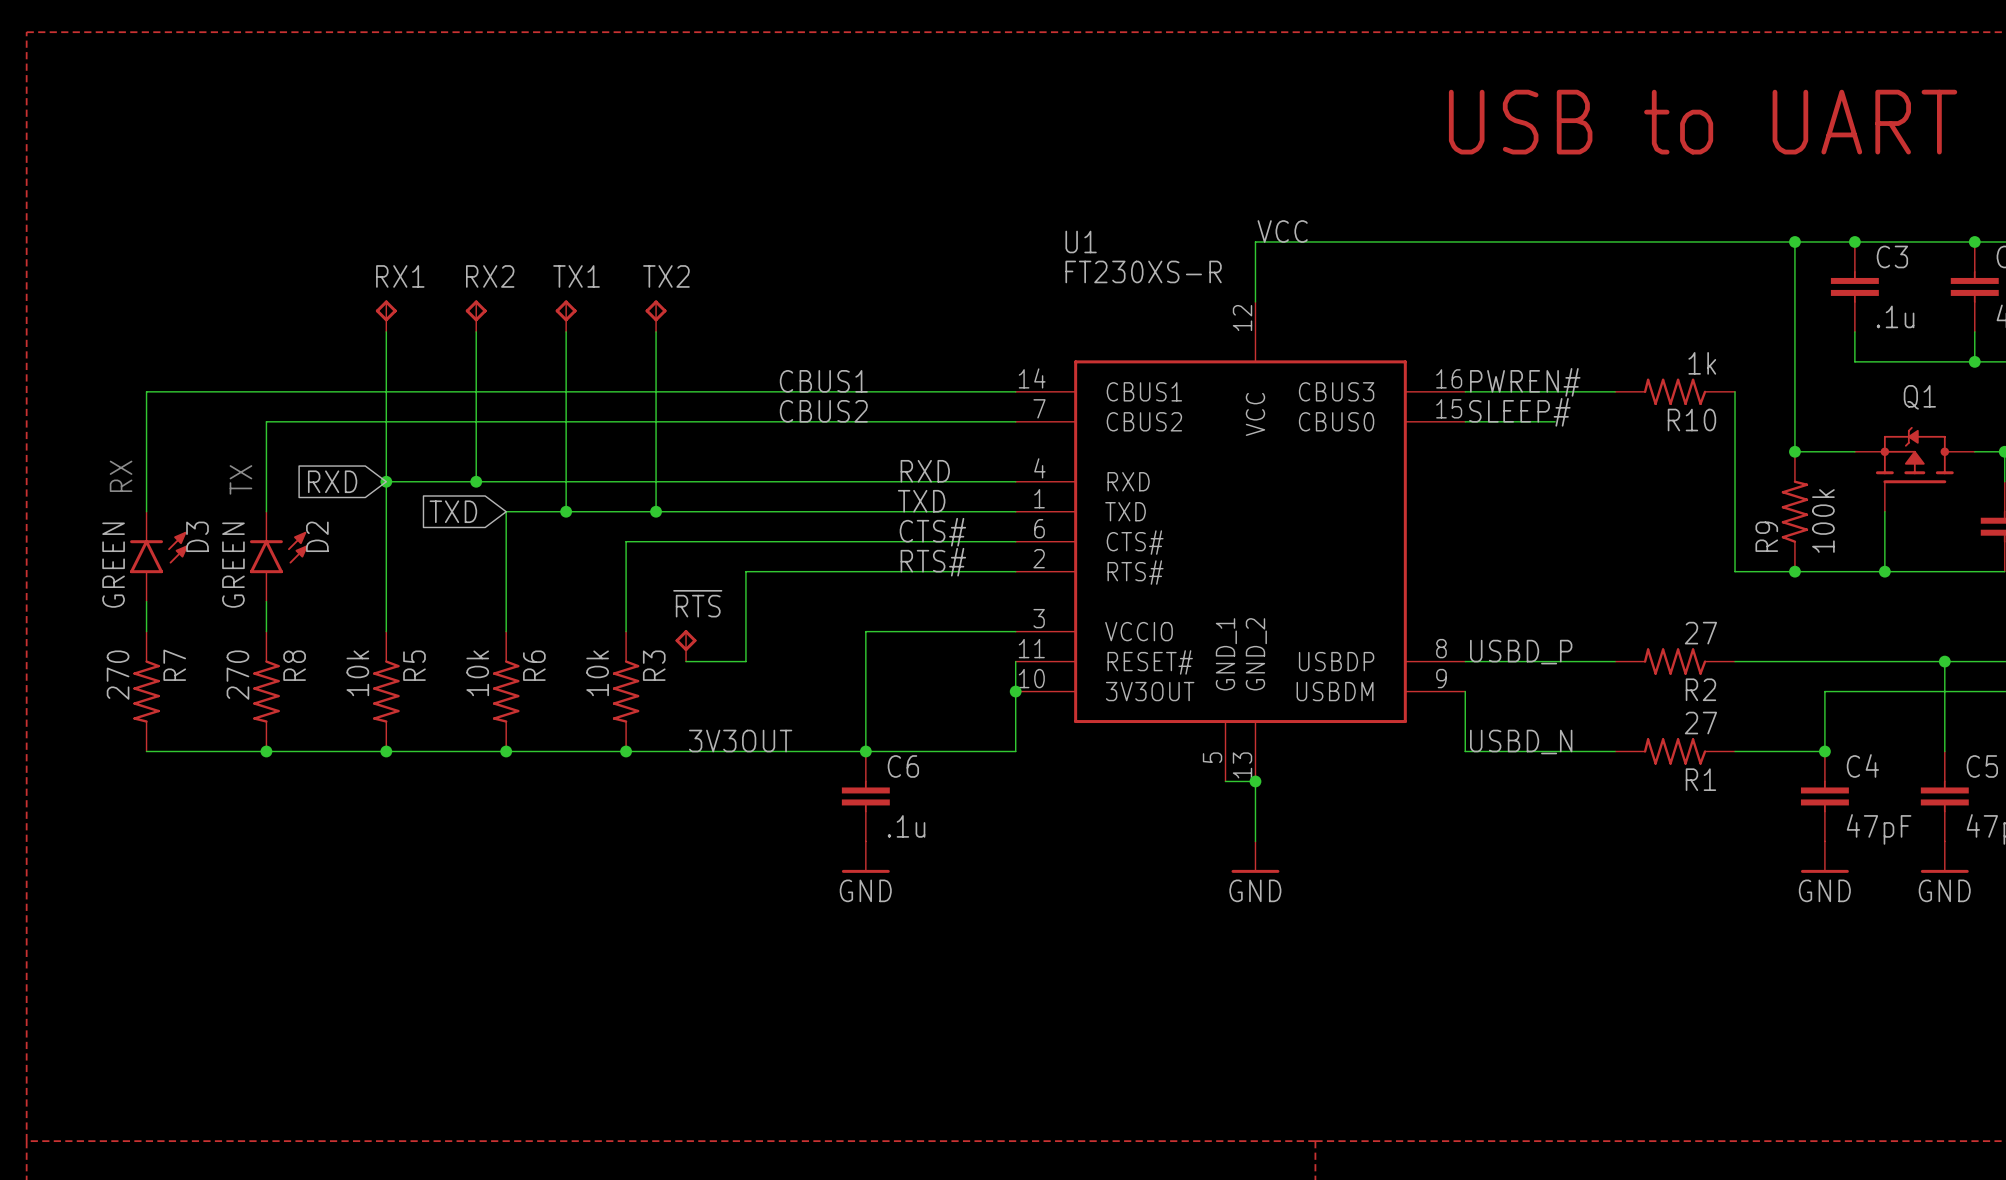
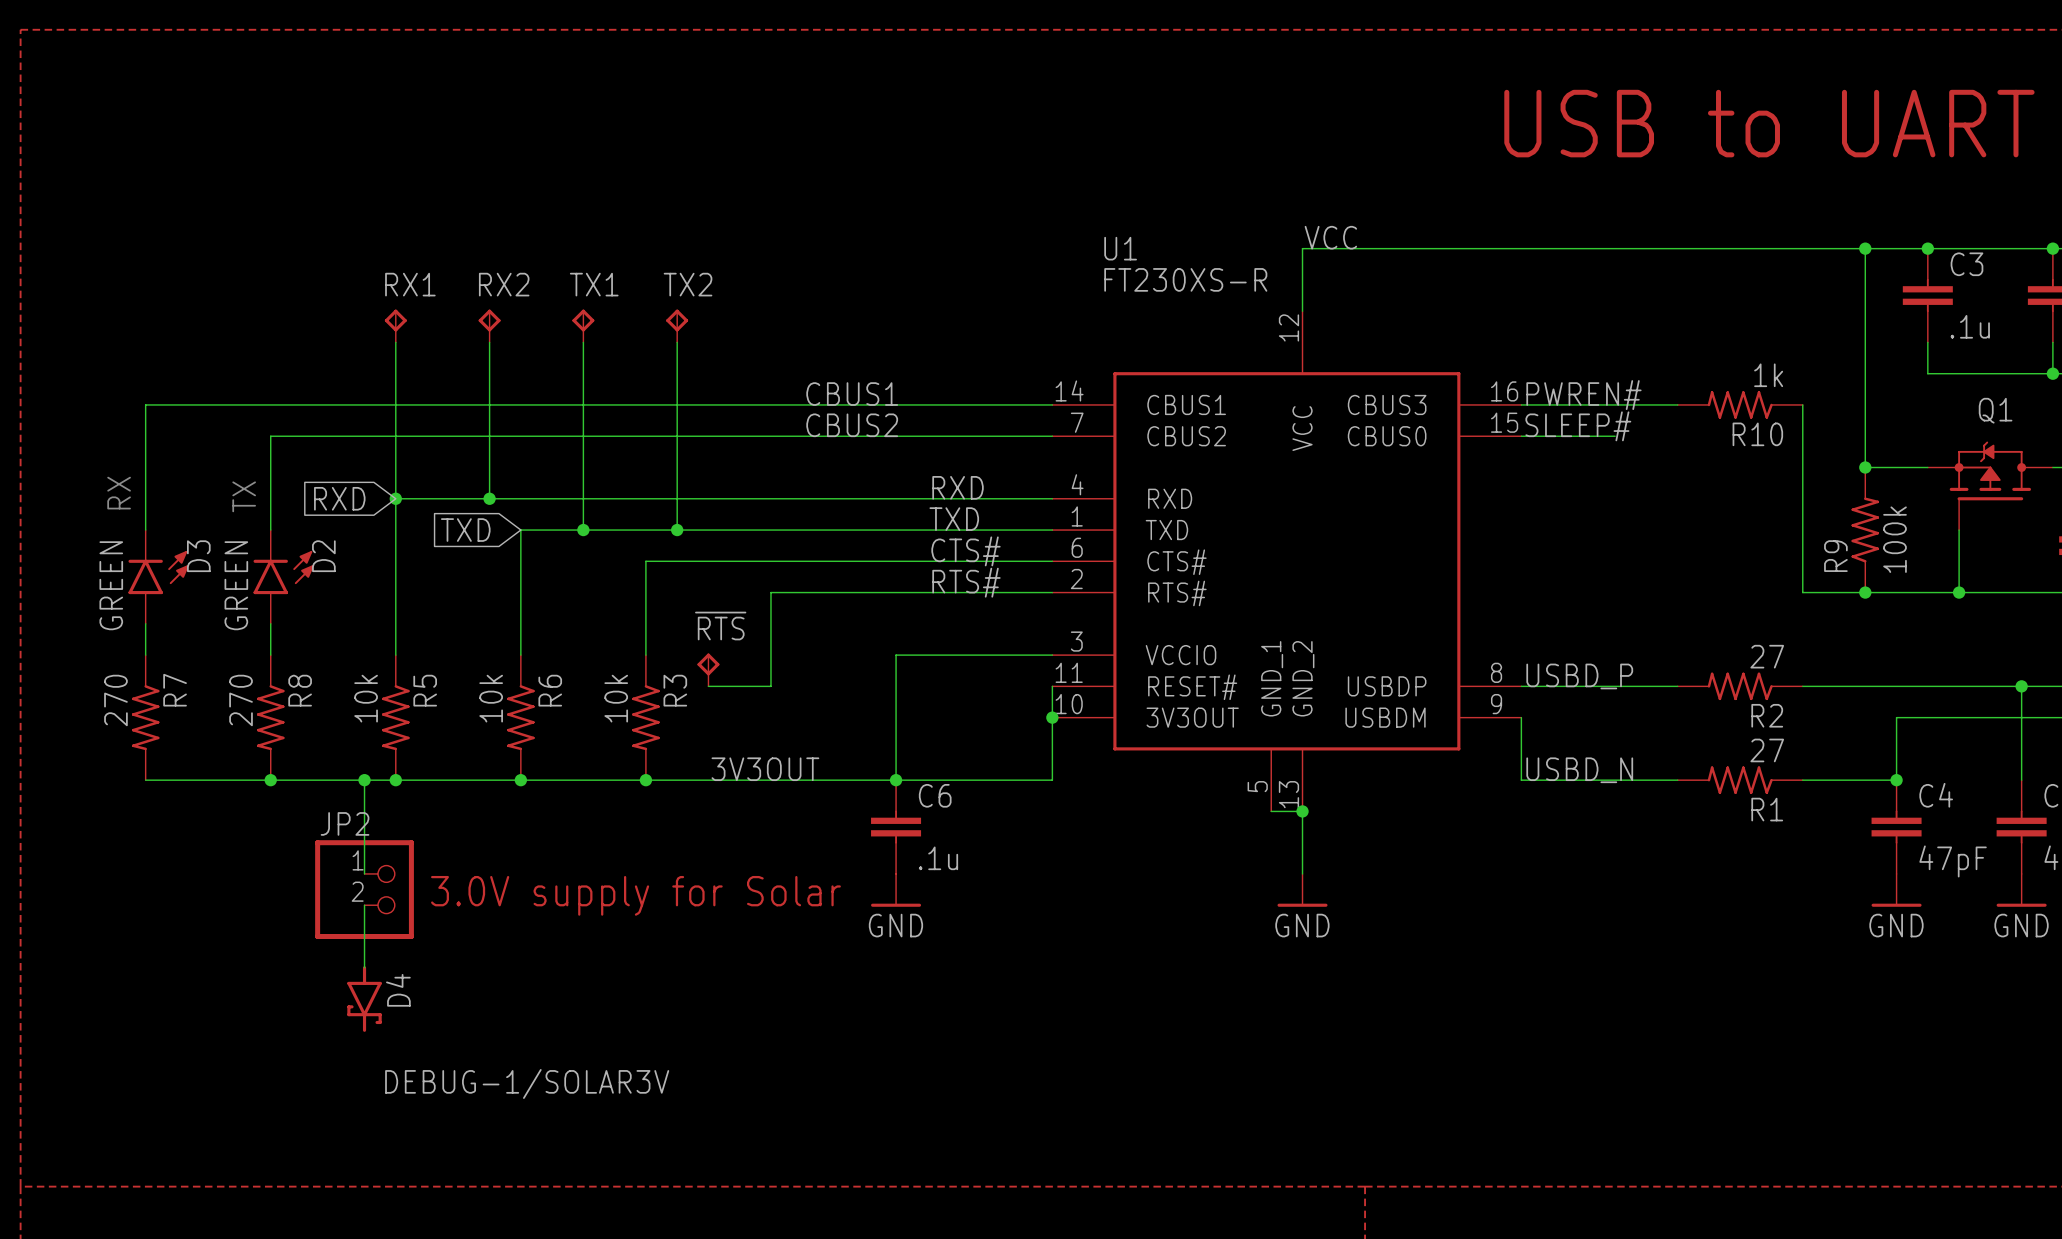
wire: none -> (364, 780) (364, 873)
junction: none -> (364, 780)
JP2: none -> (364, 889)
text: none -> 3.0V supply for Solar (635, 895)
wire: none -> (364, 905) (364, 967)
D4: none -> (364, 999)
label: none -> DEBUG-1/SOLAR3V (527, 1083)

